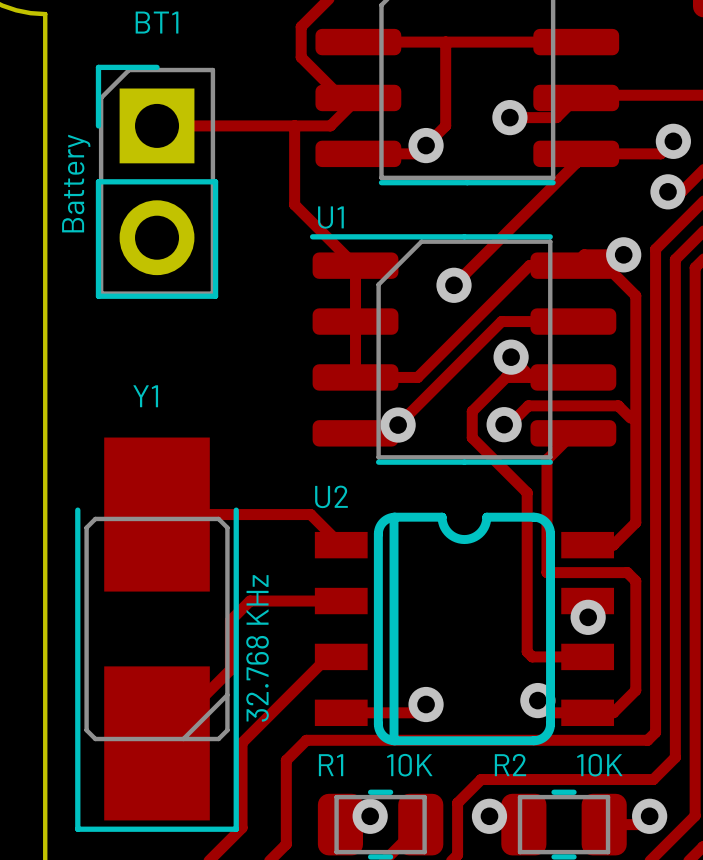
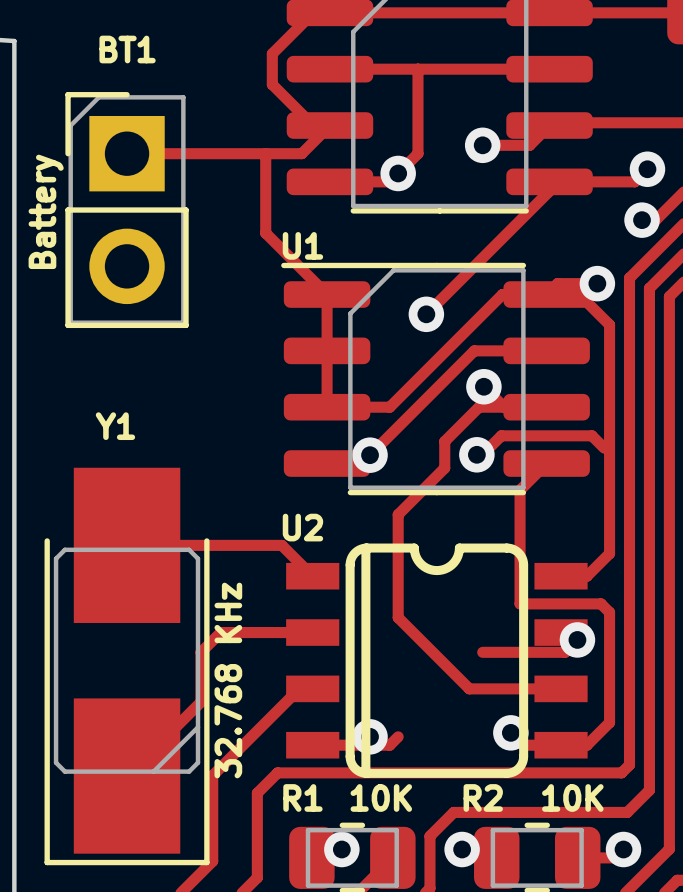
track: (472, 437) (527, 492) (527, 651) (532, 656) -> (444, 468) (398, 514) (398, 617) (469, 688) (505, 688)
track: none -> (561, 632) (568, 639) (577, 639) (565, 652) (482, 652)
via position: (588, 617) -> (577, 639)
via position: (426, 704) -> (370, 736)

